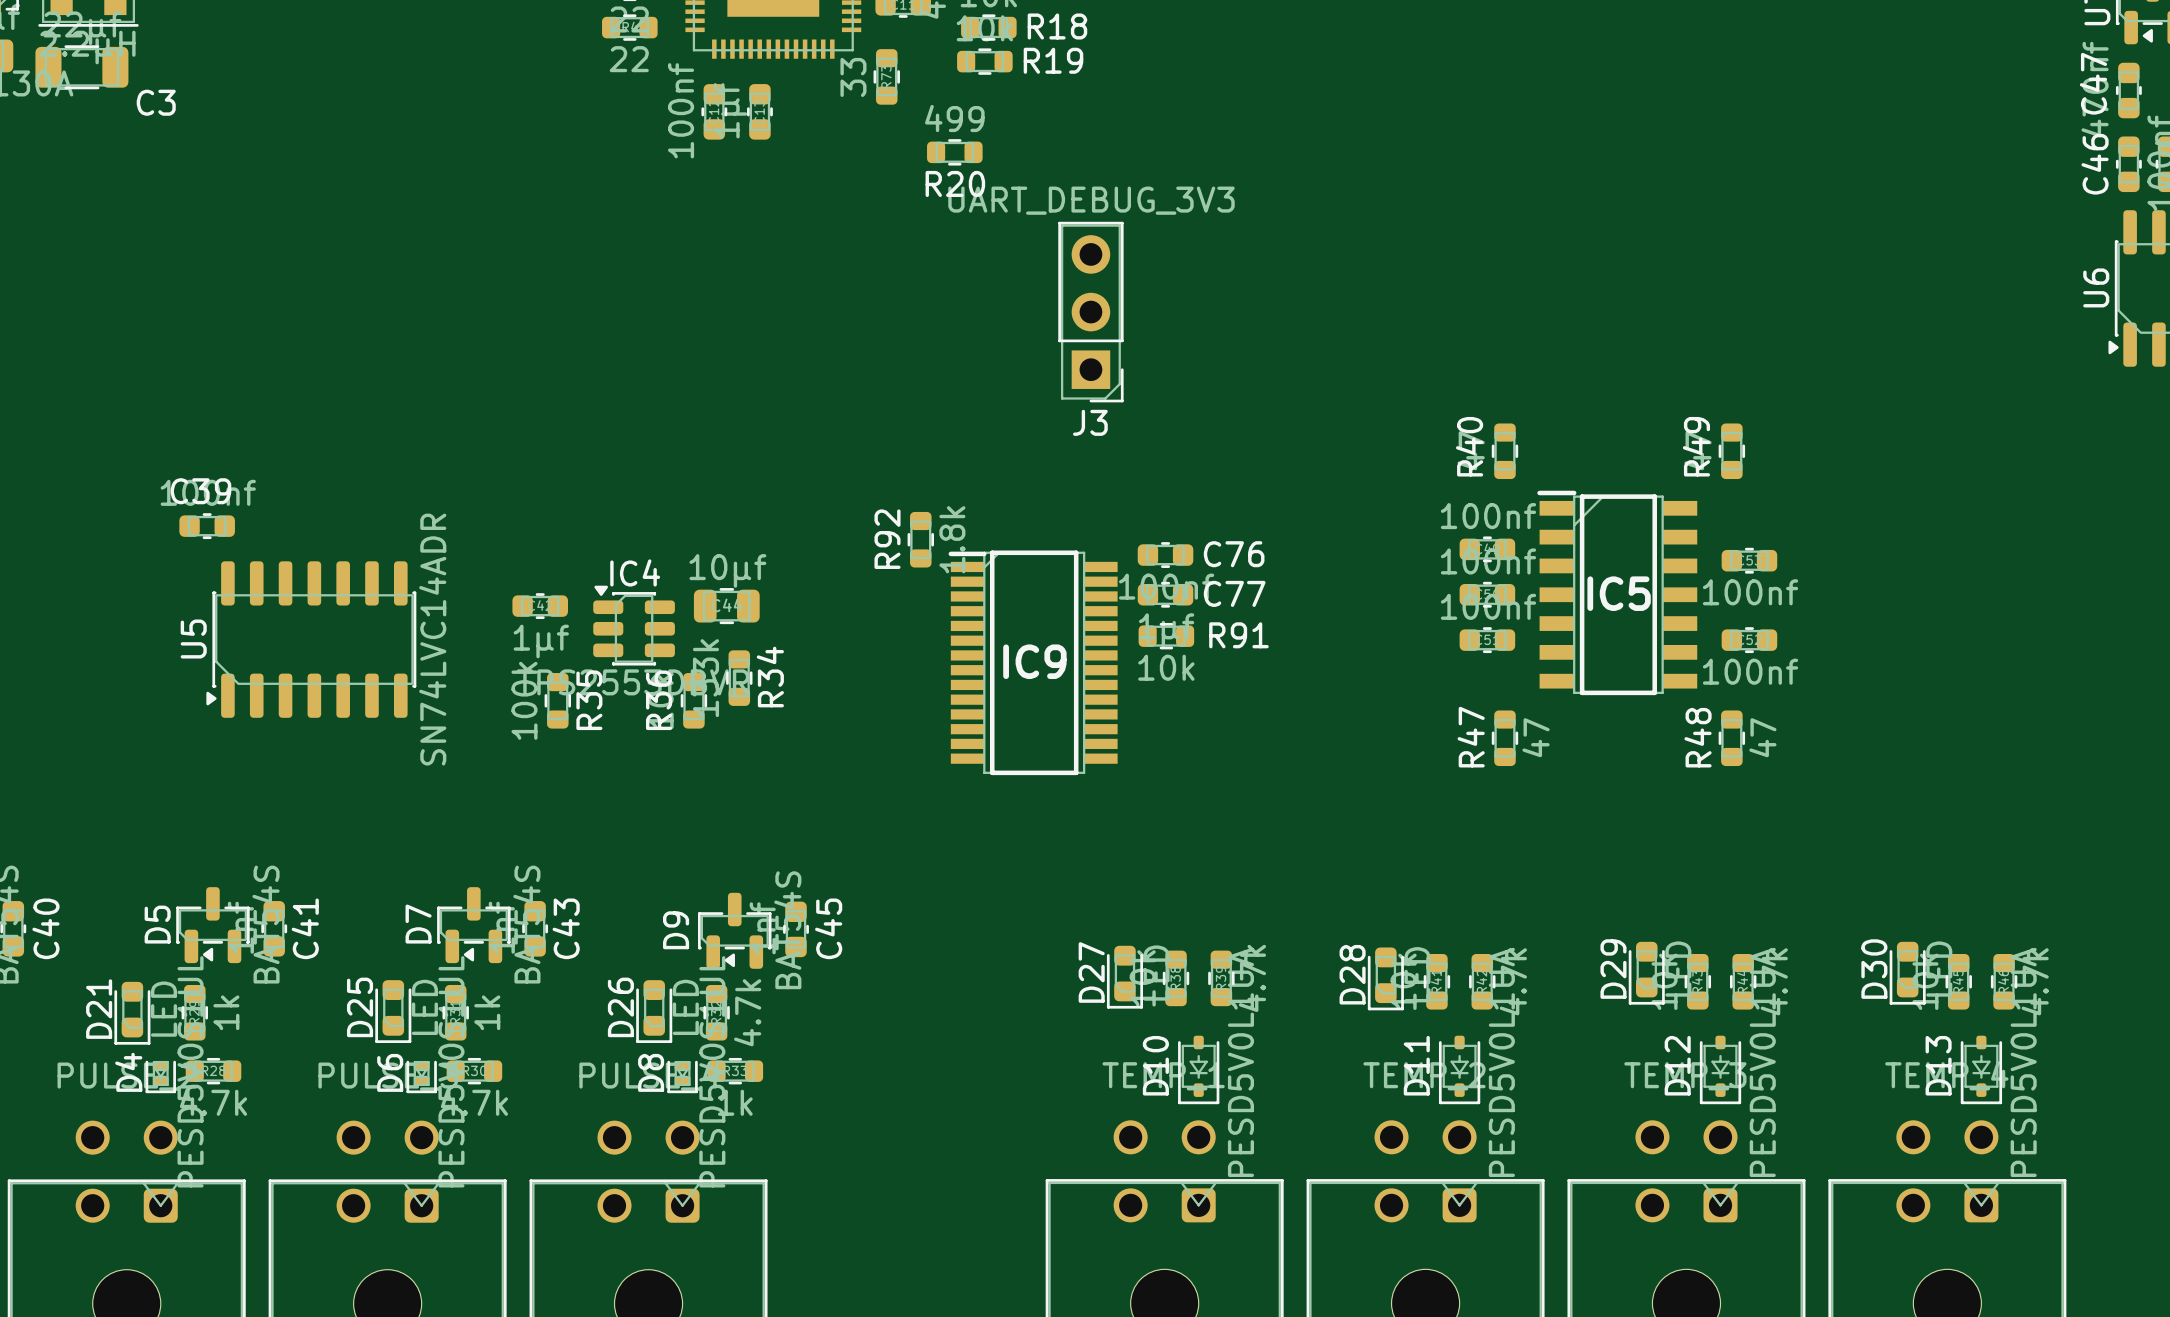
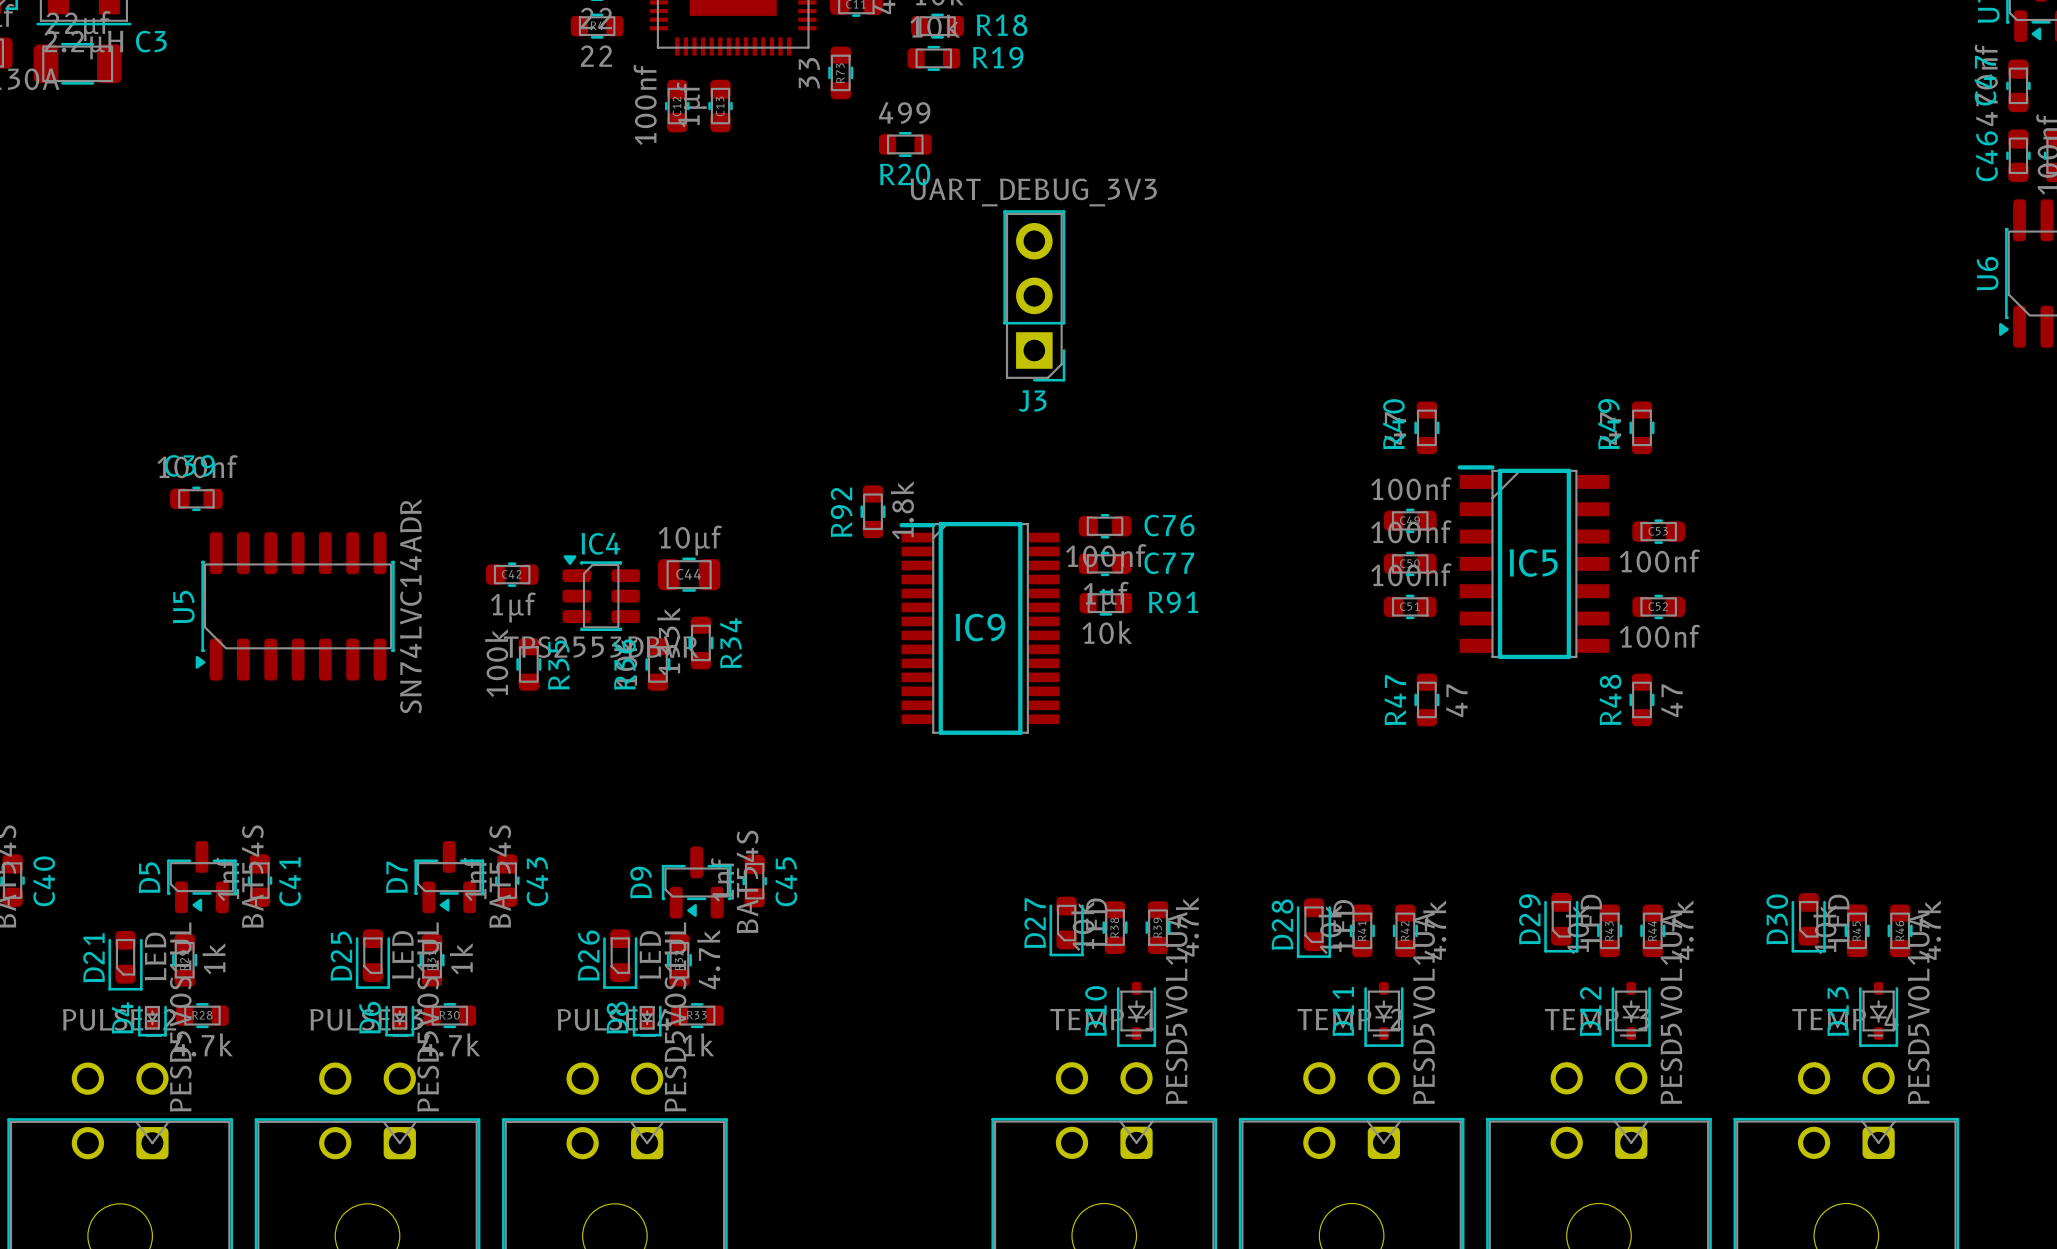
C3 name position: C3 (156, 102) -> C3 (151, 41)

